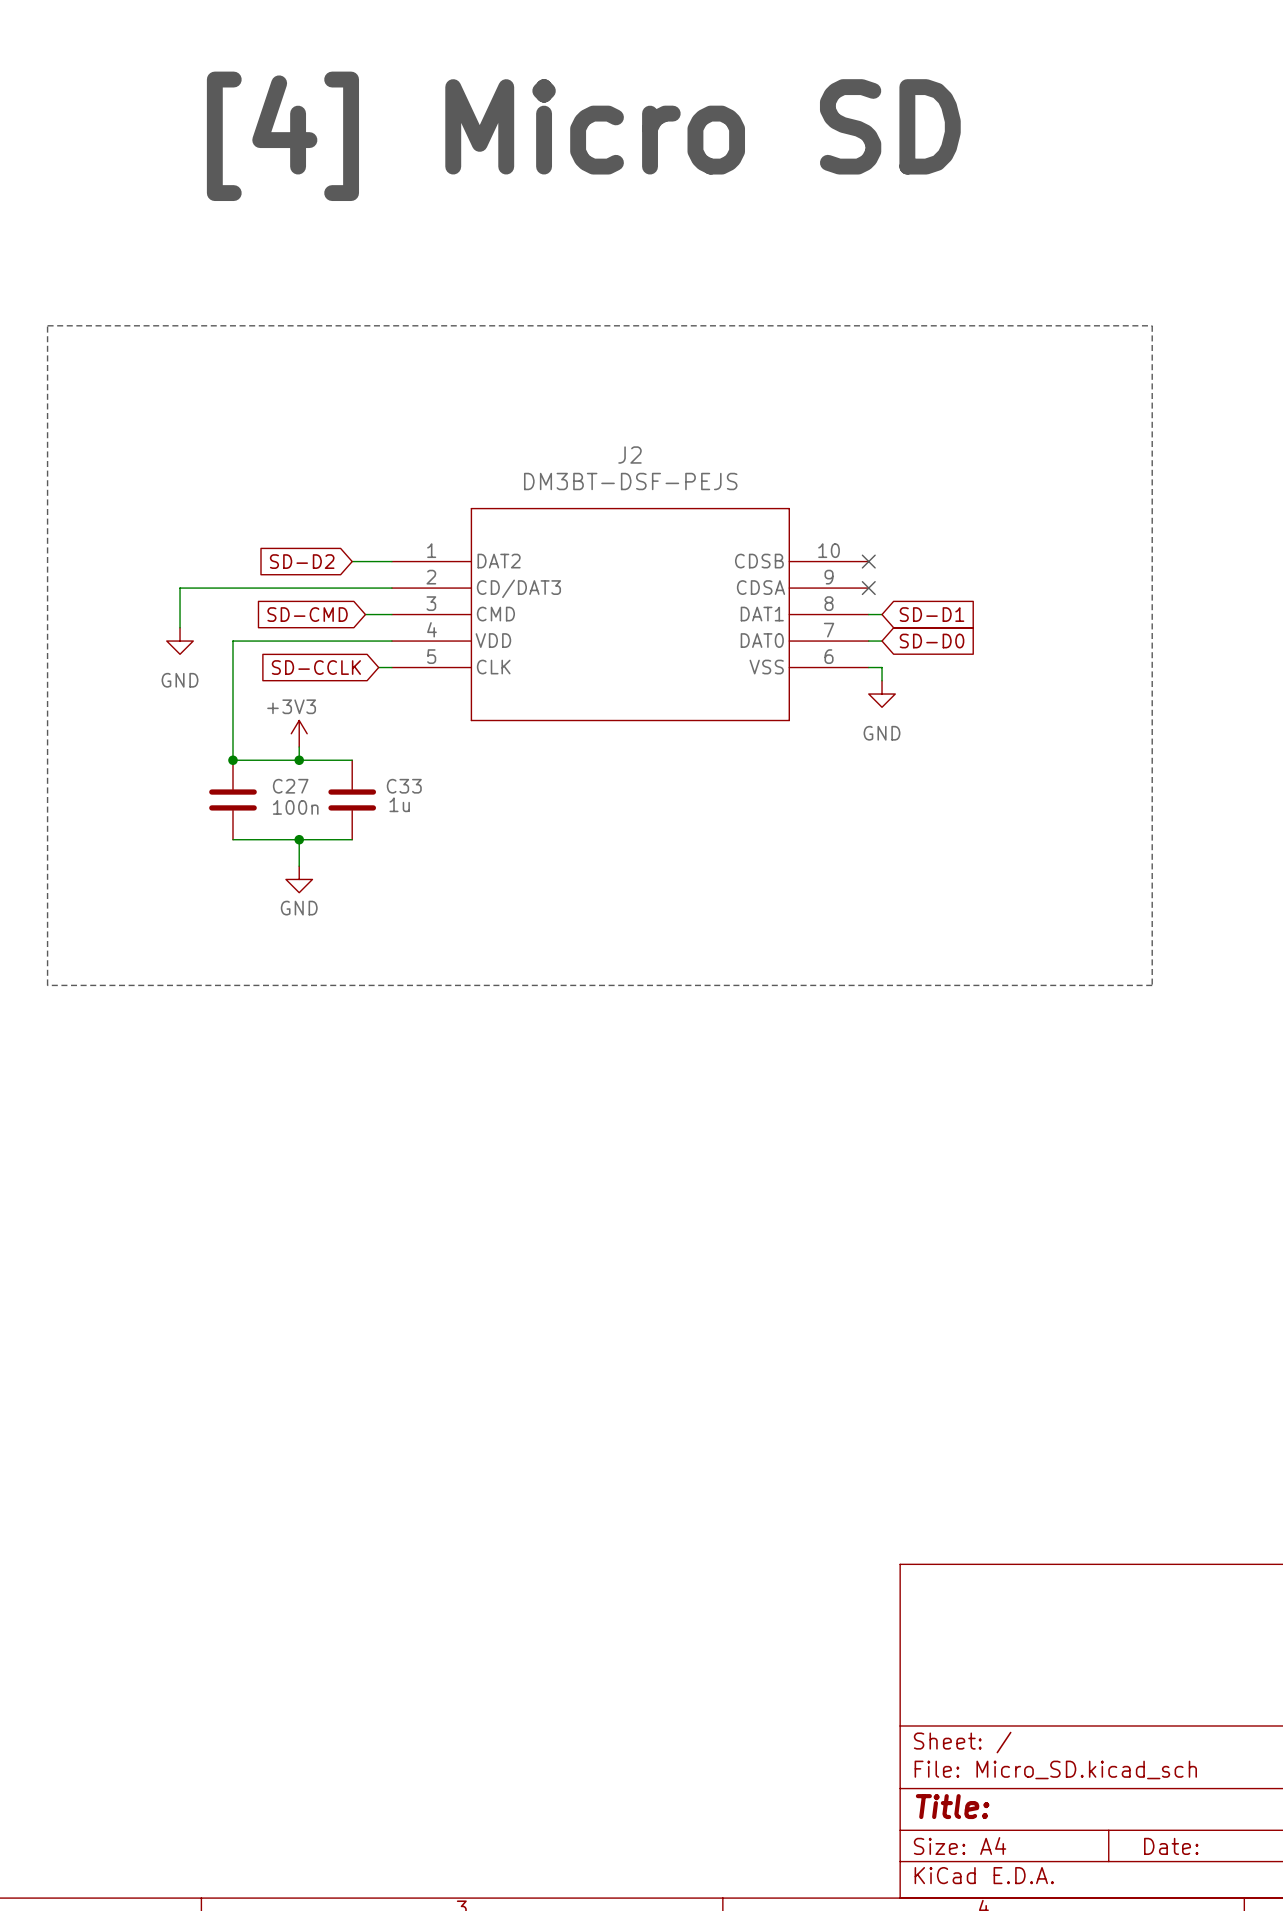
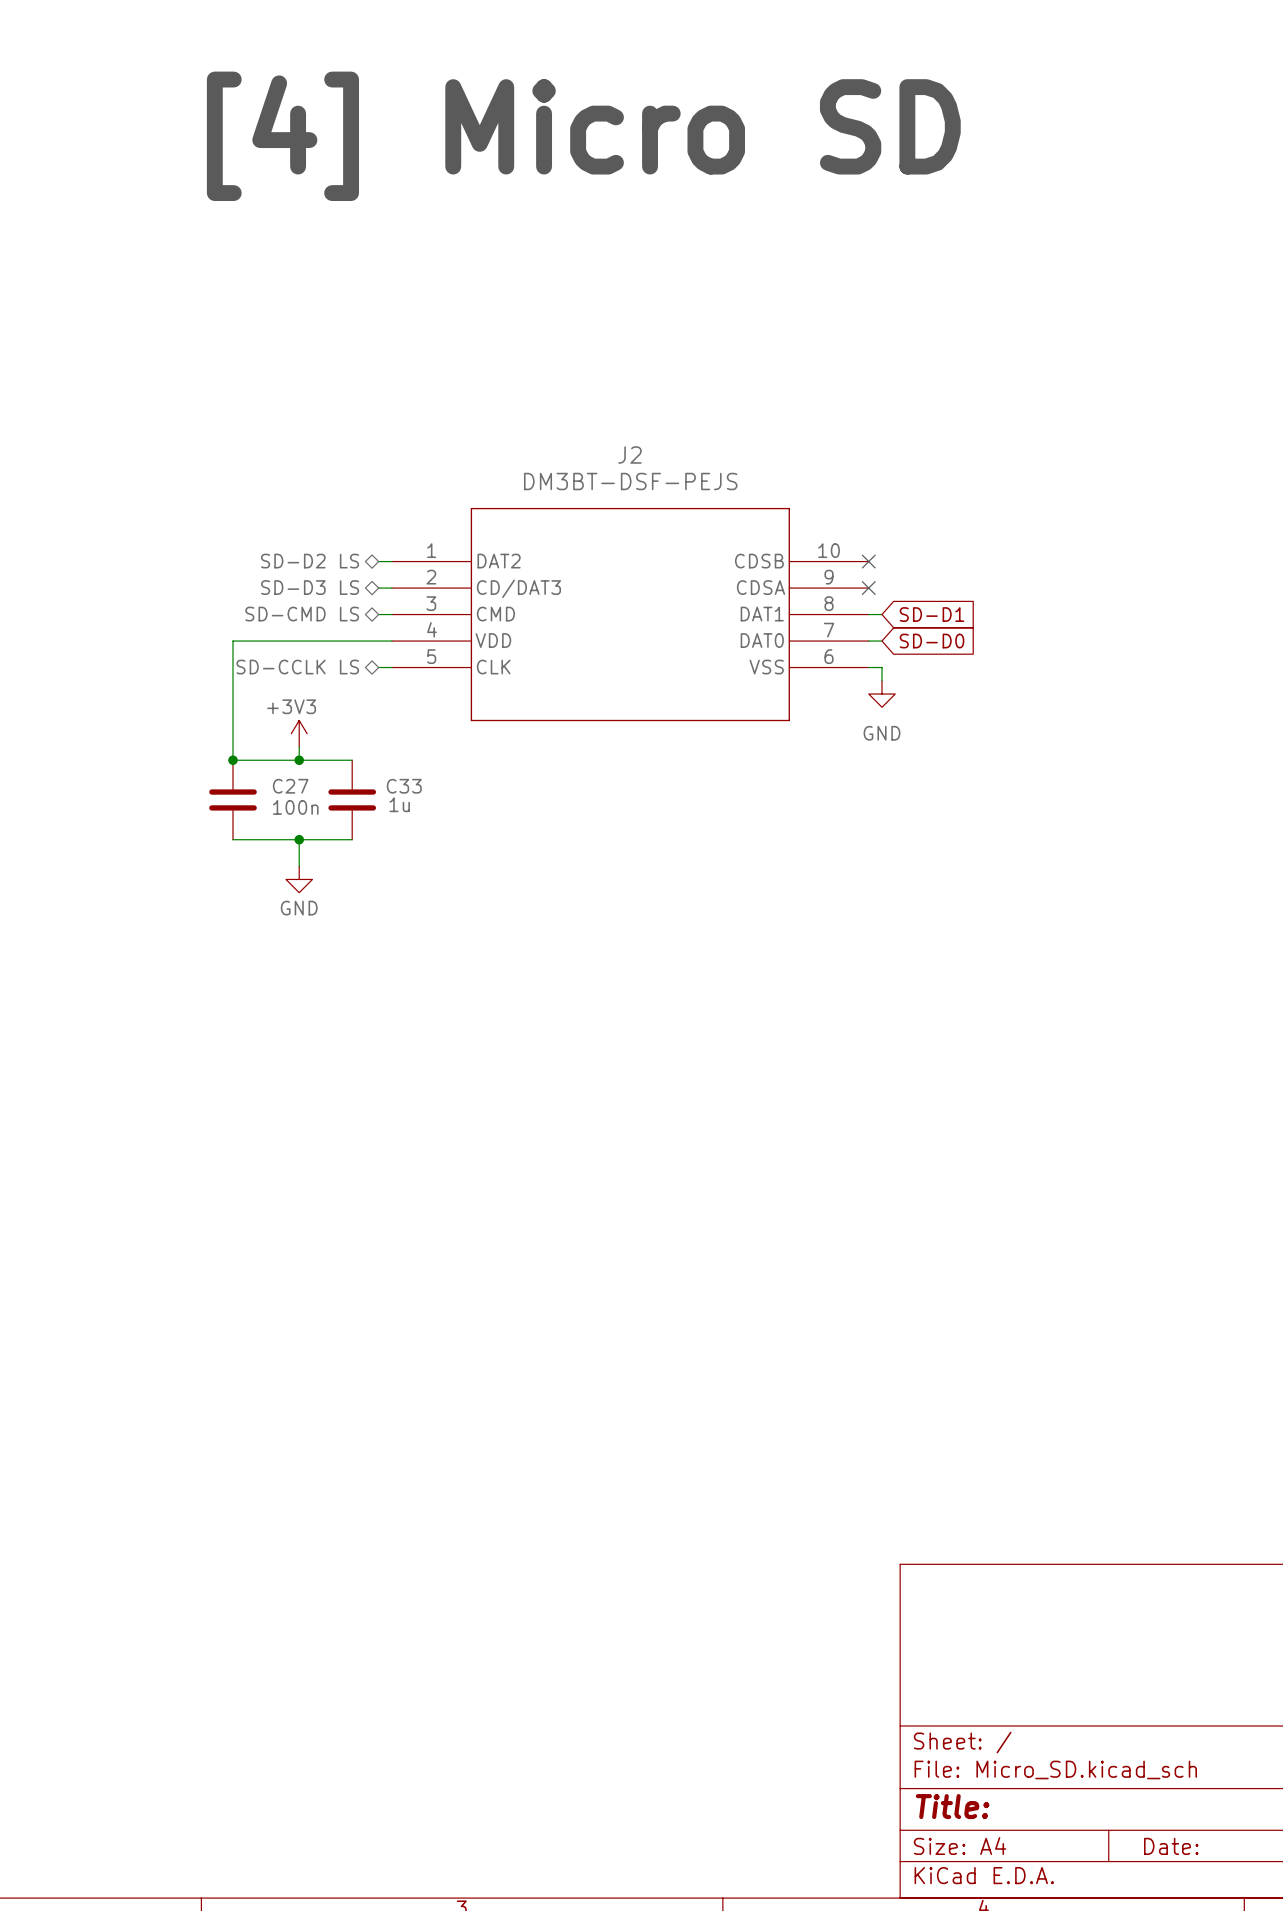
line: (47, 325) (1152, 325) (1152, 985) (47, 985) (47, 325) -> none
global label: SD-D2 (302, 561) -> none
hierarchical label: none -> SD-D2 LS (310, 561)
wire: (352, 561) (378, 561) -> none
hierarchical label: none -> SD-D3 LS (310, 587)
wire: (378, 588) (180, 588) (180, 627) -> none
hierarchical label: none -> SD-CMD LS (302, 614)
global label: SD-CMD (307, 614) -> none
wire: (365, 614) (378, 614) -> none
power symbol: GND (180, 641) -> none
hierarchical label: none -> SD-CCLK LS (297, 667)
global label: SD-CCLK (316, 667) -> none

